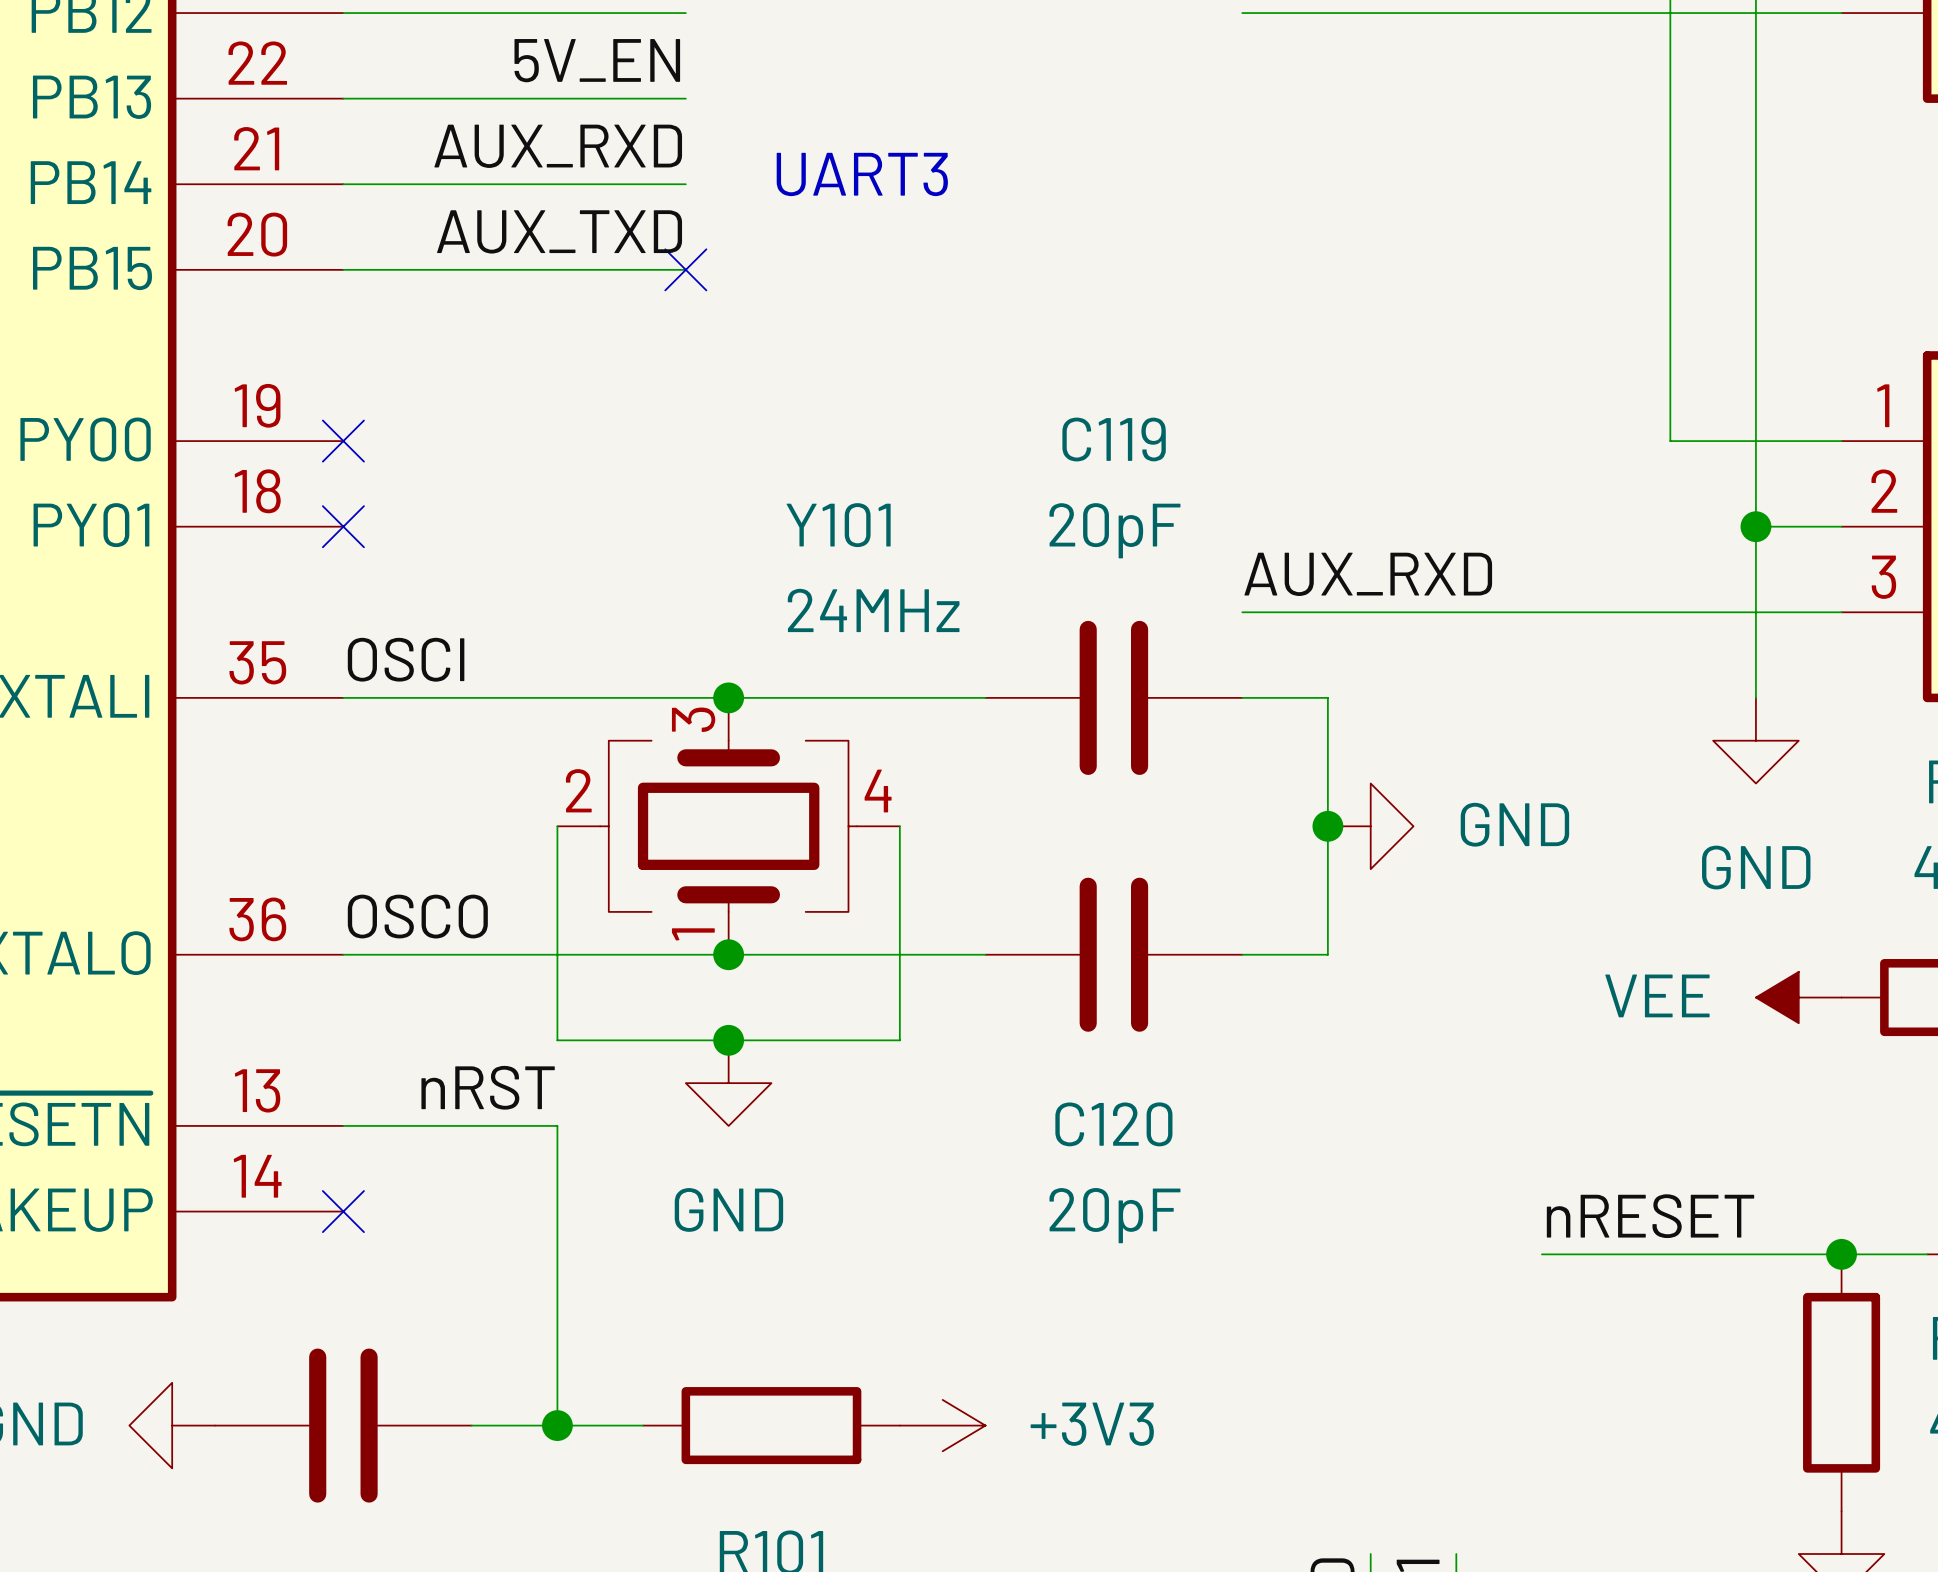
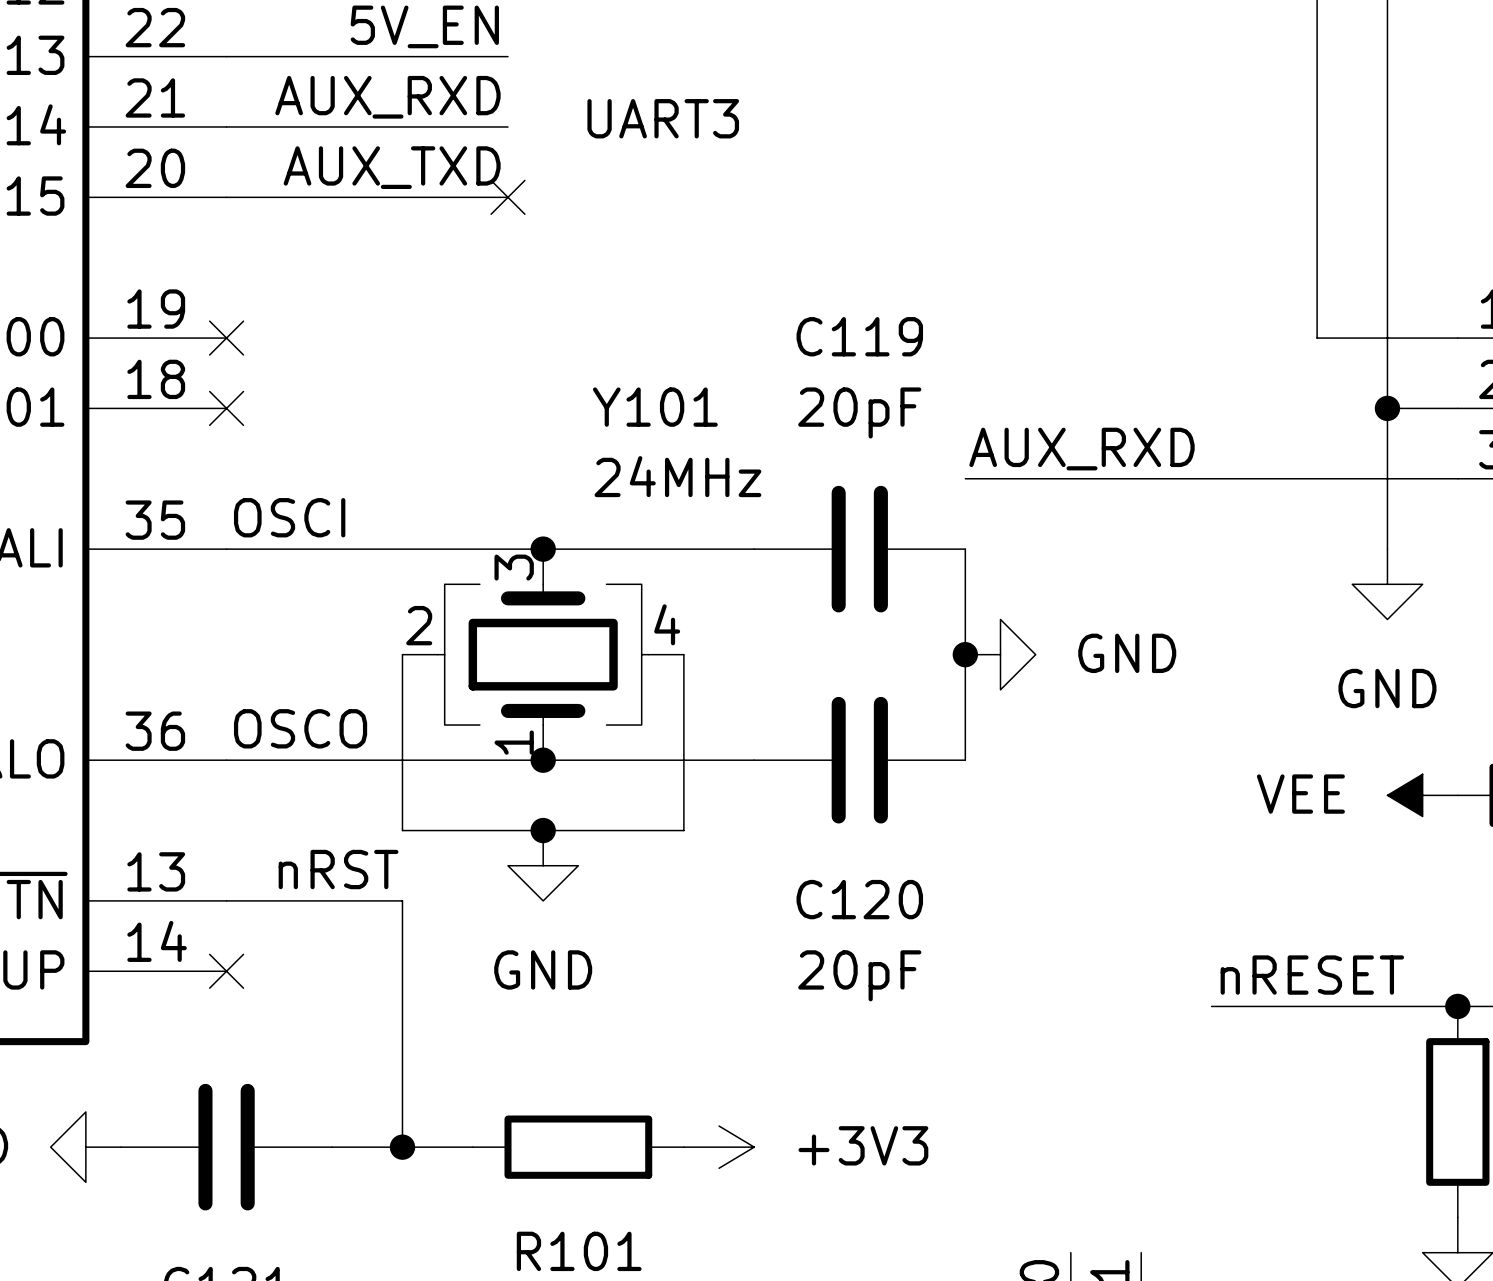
wire: (1242, 697) (1327, 697) (1327, 954) (1242, 954) -> (965, 549) (965, 760)
junction position: (1327, 826) -> (965, 654)
power symbol position: GND (1370, 826) -> GND (1000, 654)

